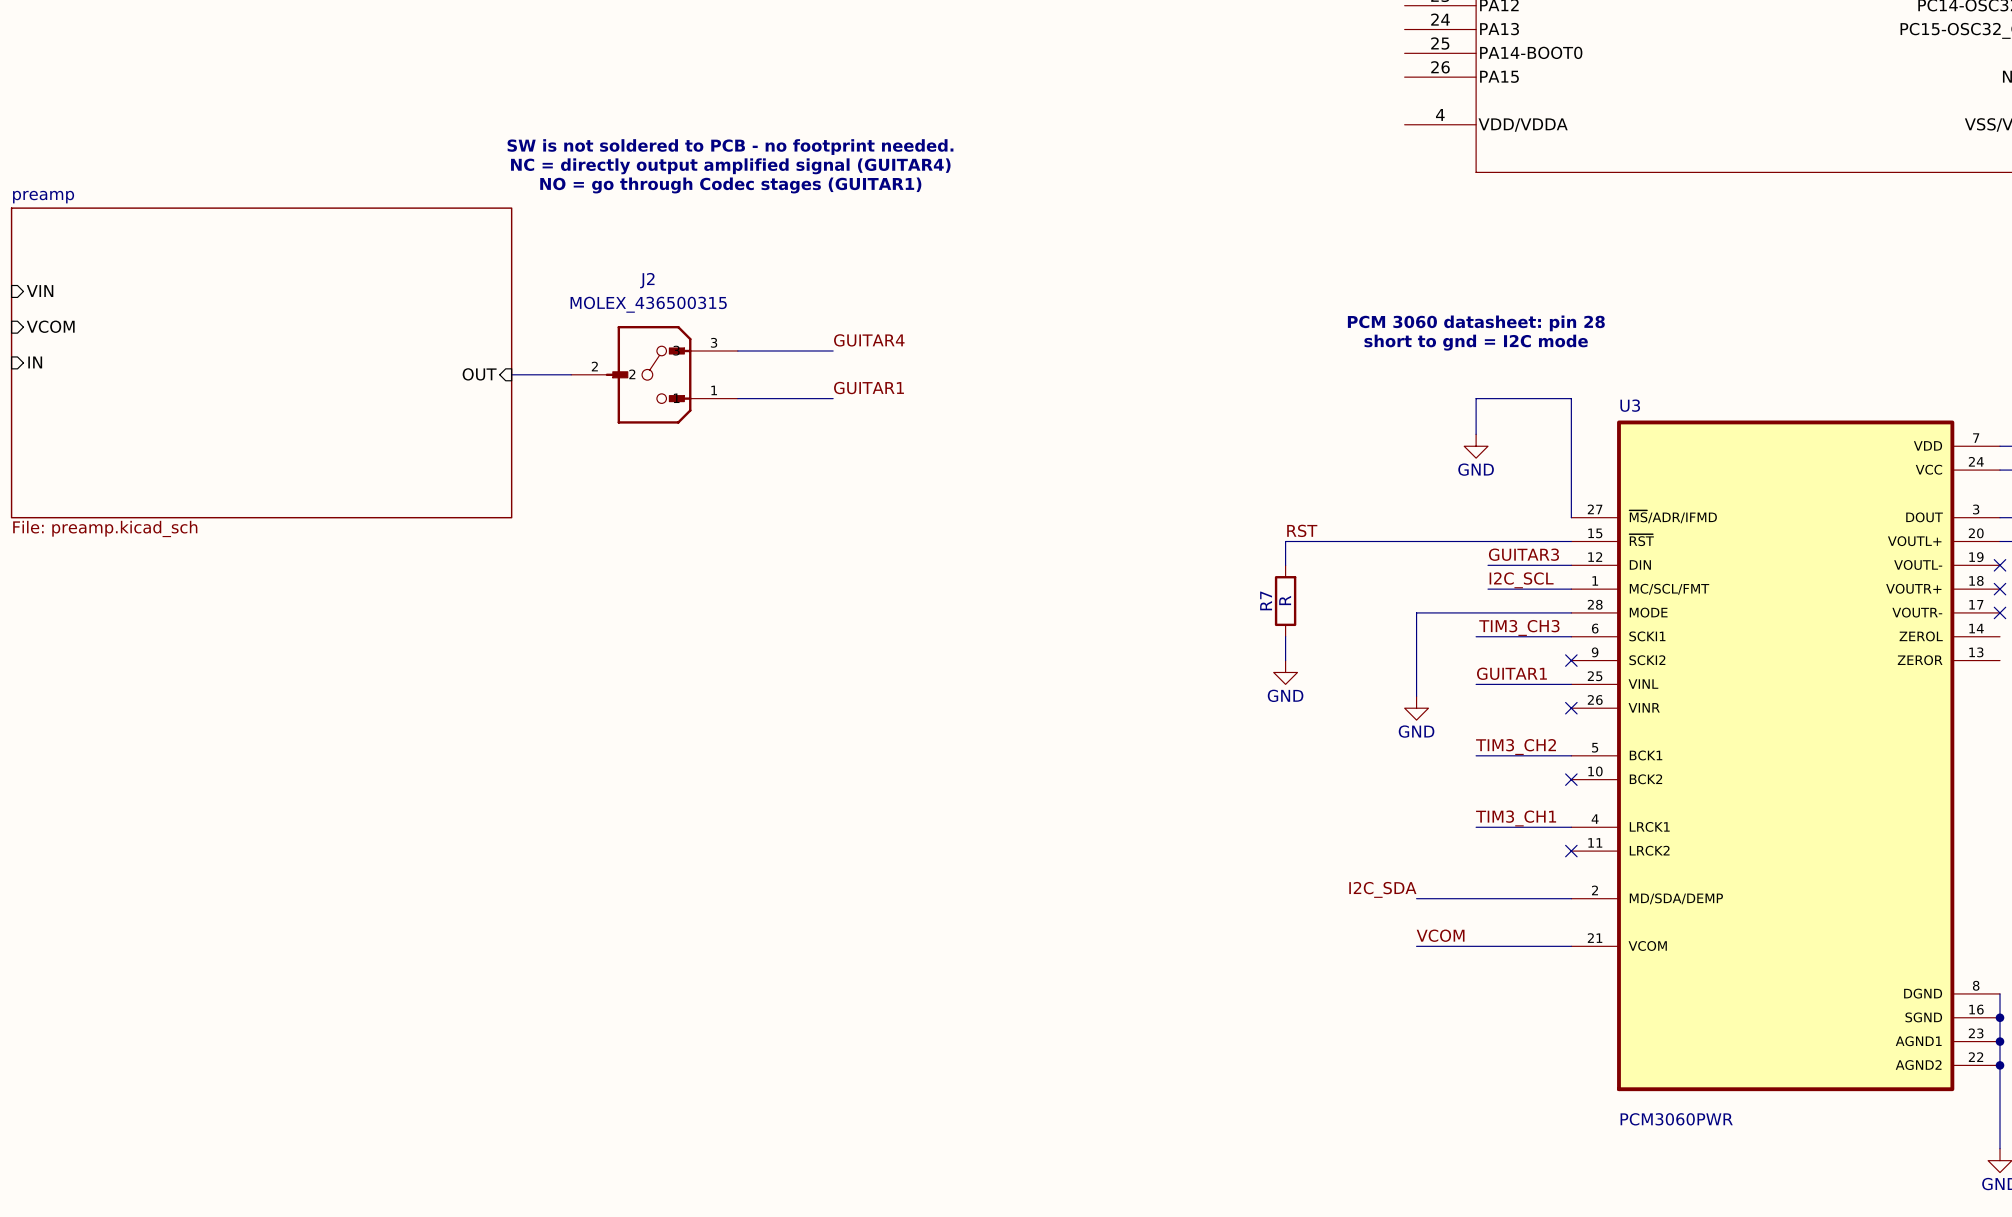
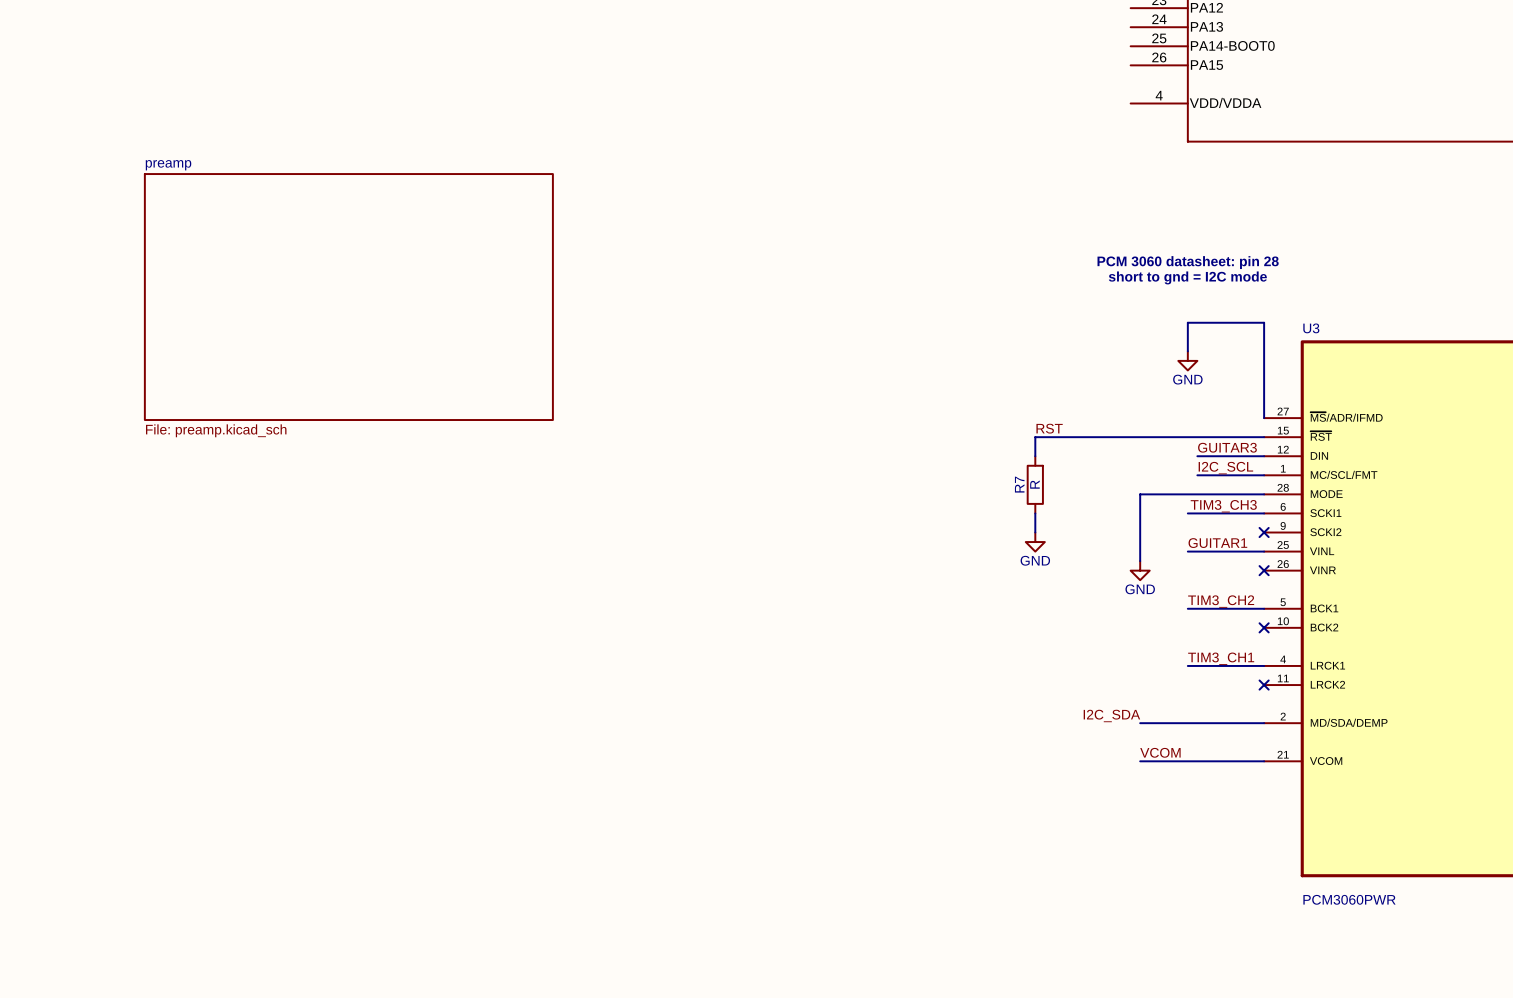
text: SW is not soldered to PCB - no footprint needed. (730, 147) -> none
text: NC = directly output amplified signal (GUITAR4) (730, 166) -> none
text: NO = go through Codec stages (GUITAR1) (730, 185) -> none
sheet pin: VIN (40, 291) -> none
sheet pin: VCOM (50, 326) -> none
label: GUITAR4 (869, 340) -> none
wire: (737, 350) (833, 350) -> none
sheet pin: IN (35, 362) -> none
sheet preamp: File: preamp.kicad_sch (261, 362) -> none
sheet preamp: none -> File: preamp.kicad_sch (348, 297)
sheet pin: OUT (479, 374) -> none
wire: (511, 374) (571, 374) -> none
J2: MOLEX_436500315 (654, 374) -> none
label: GUITAR1 (869, 388) -> none
wire: (737, 398) (833, 398) -> none

